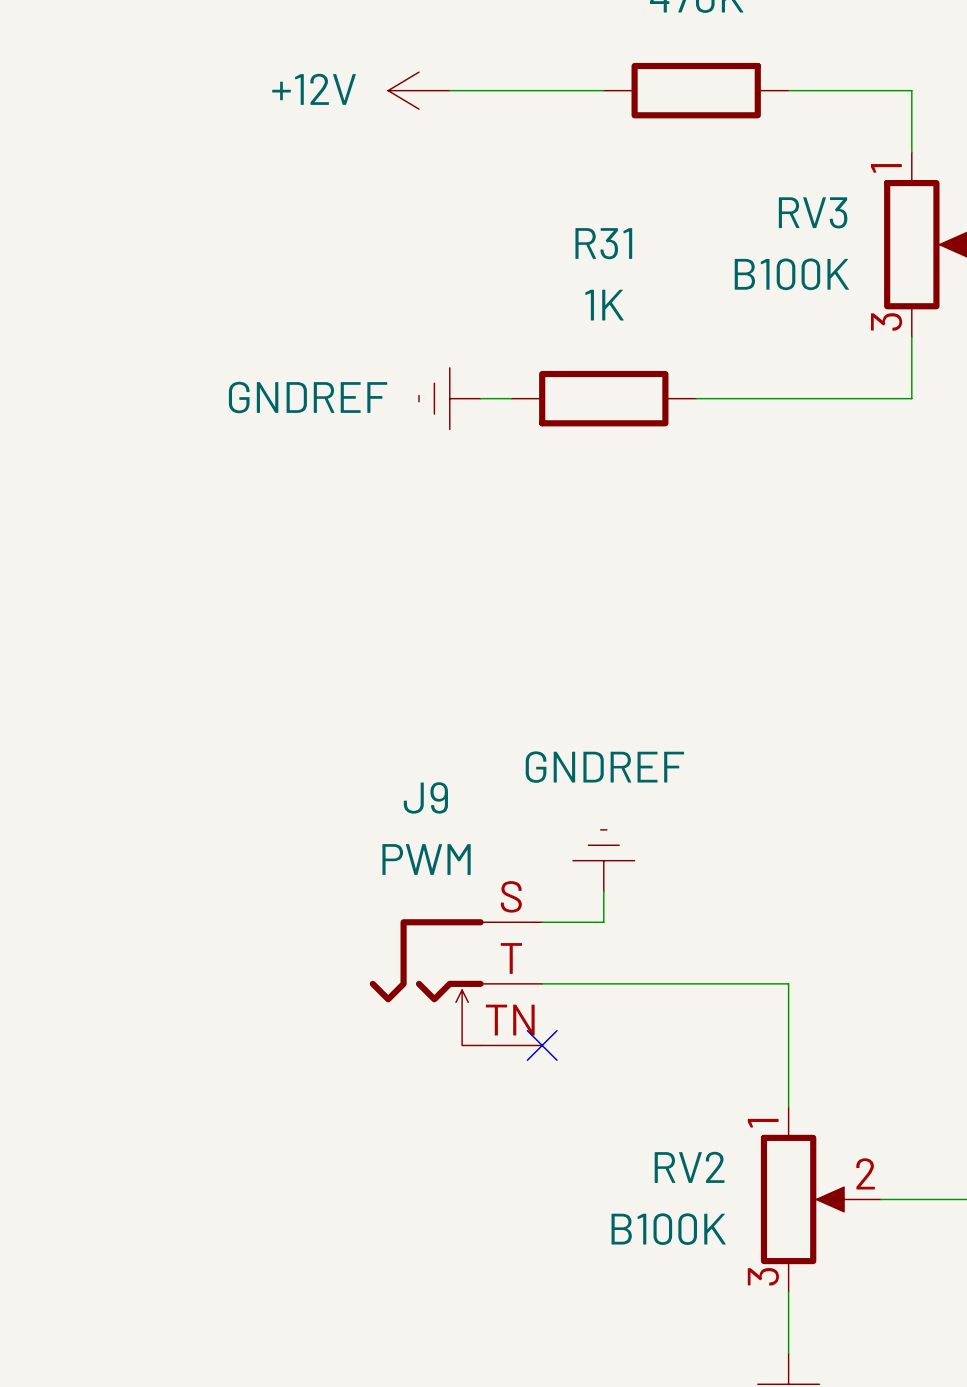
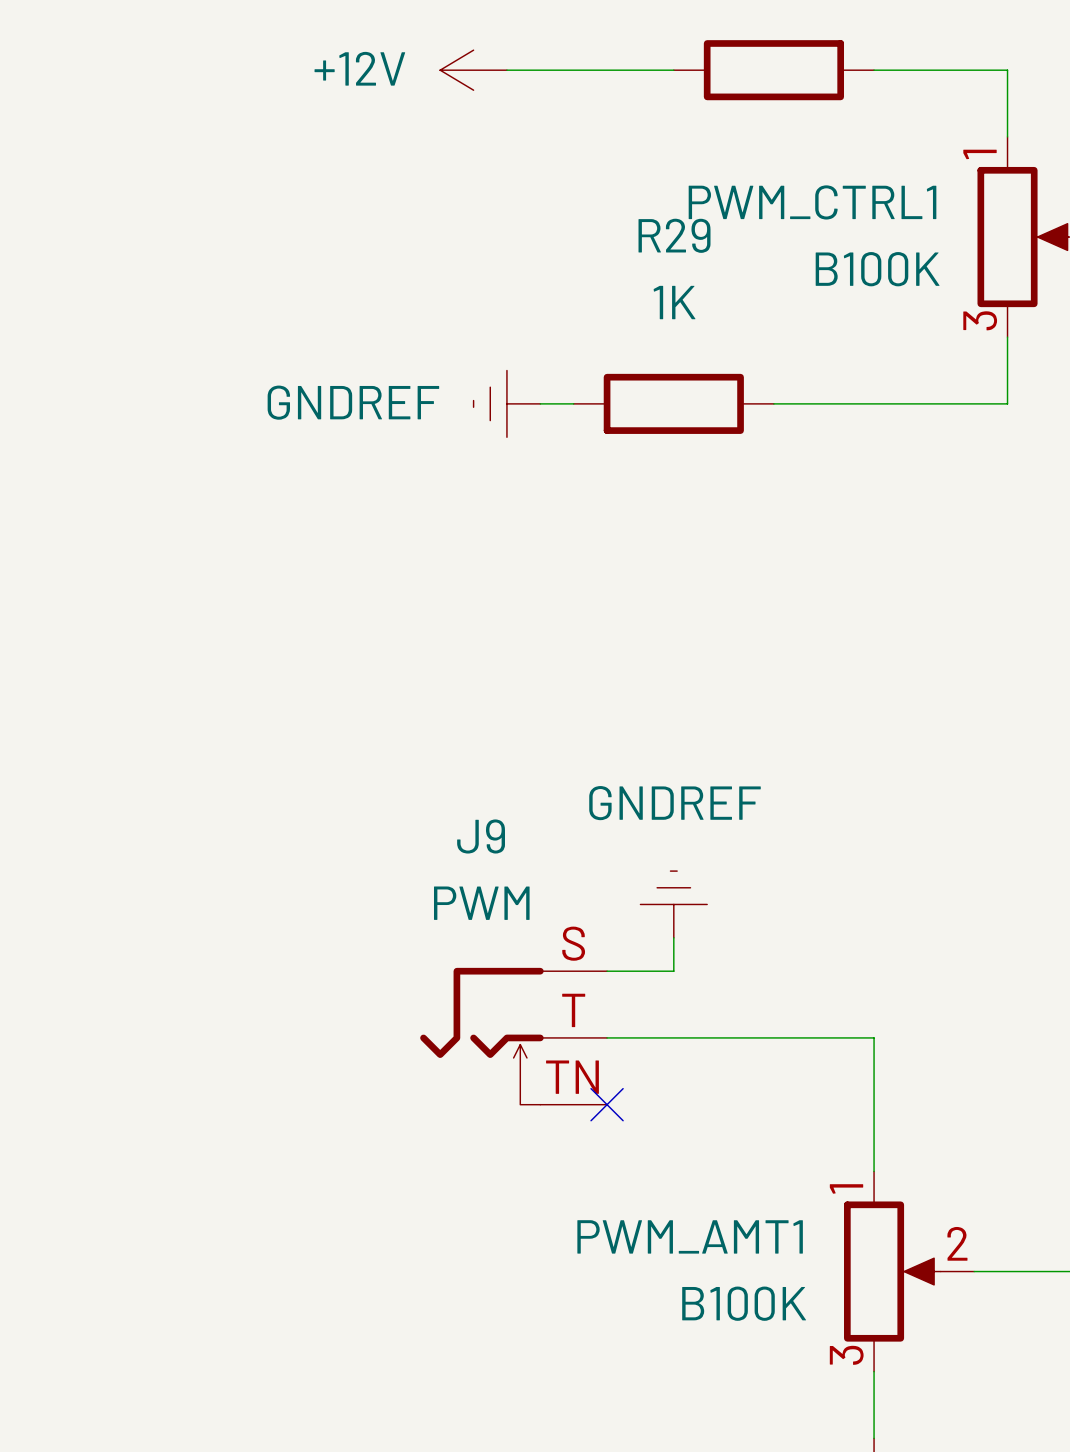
RV3 name: RV3 (813, 212) -> PWM_CTRL1 (812, 202)
R31 name: R31 (603, 243) -> R29 (674, 235)
RV2 name: RV2 (689, 1167) -> PWM_AMT1 (690, 1236)

